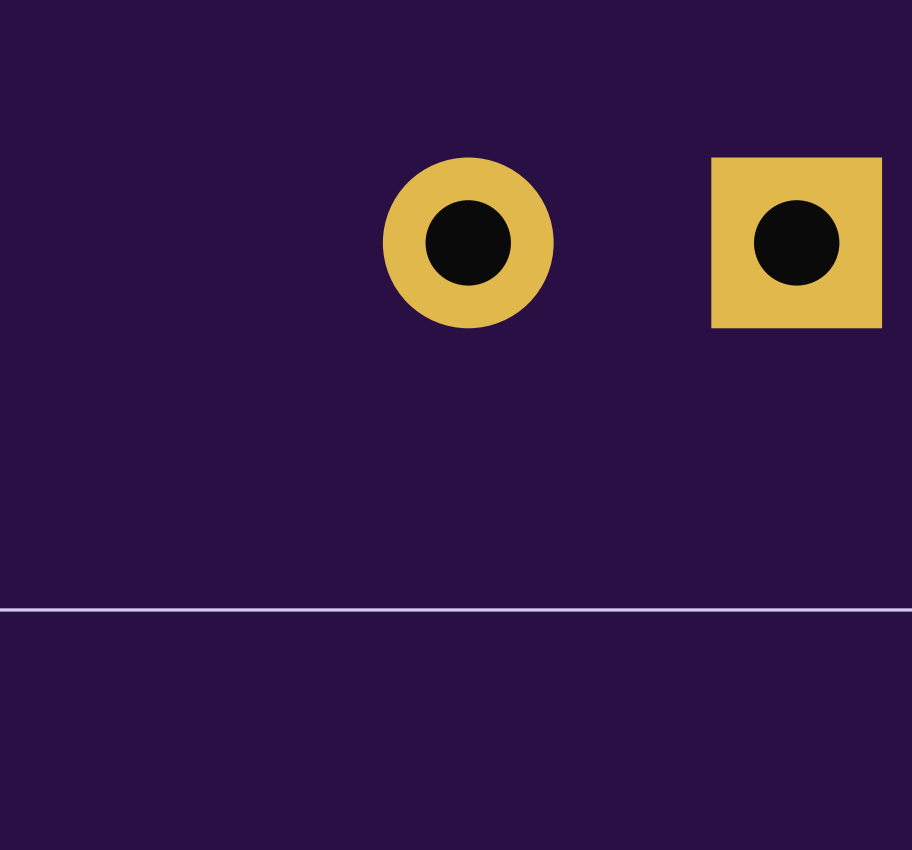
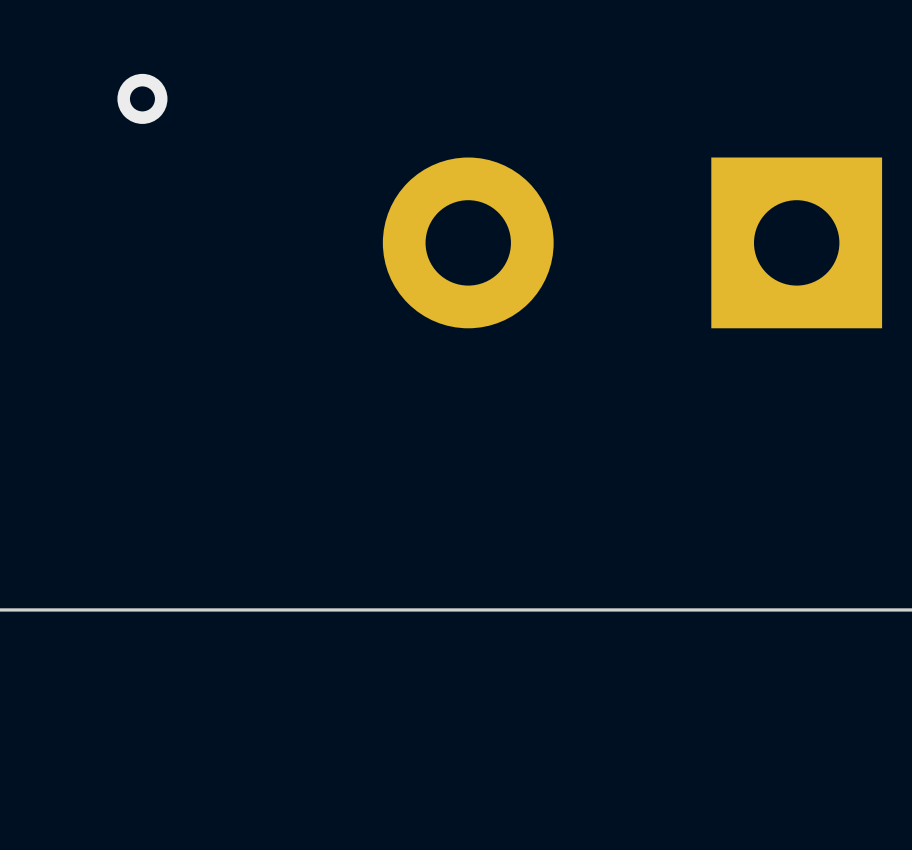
via: none -> (142, 98)

